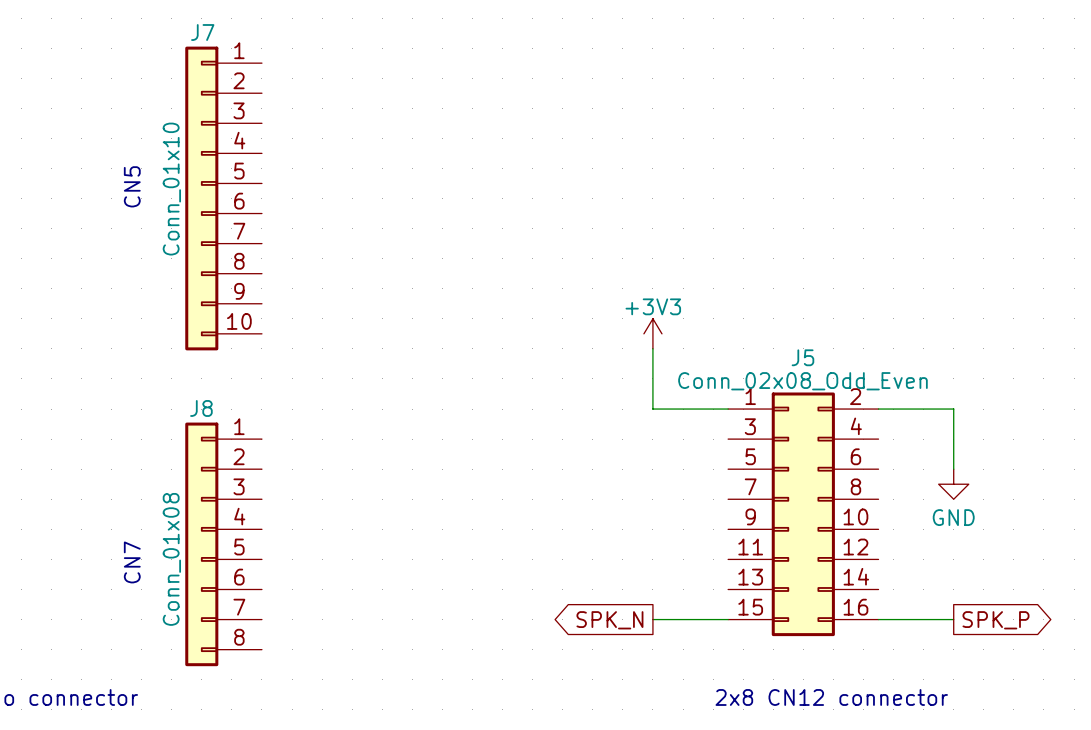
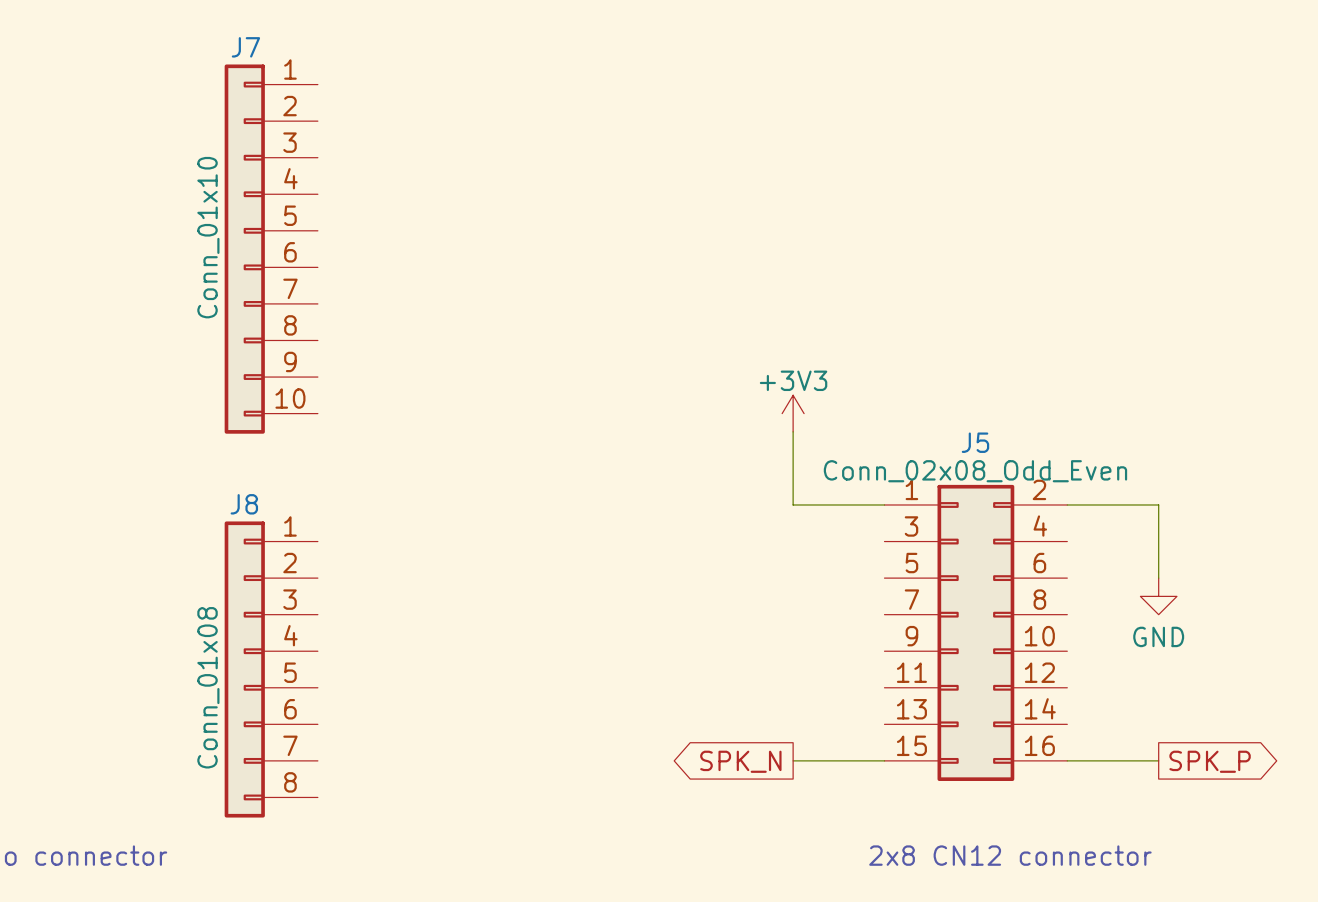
text: CN5 (132, 186) -> none
text: CN7 (132, 562) -> none

